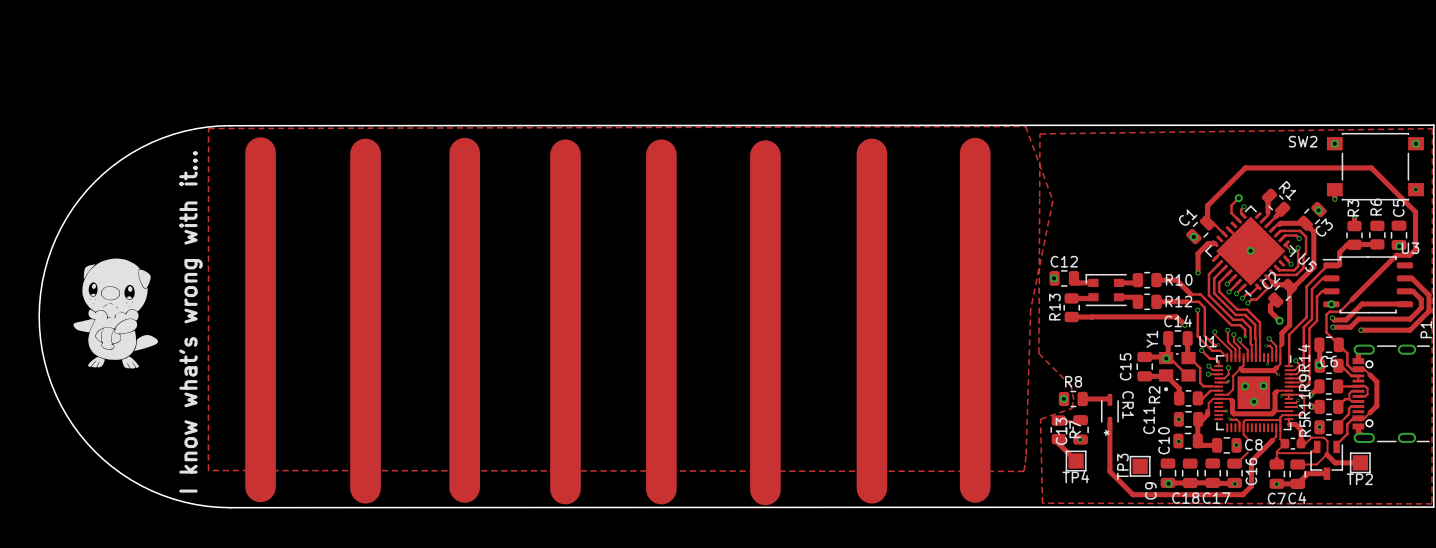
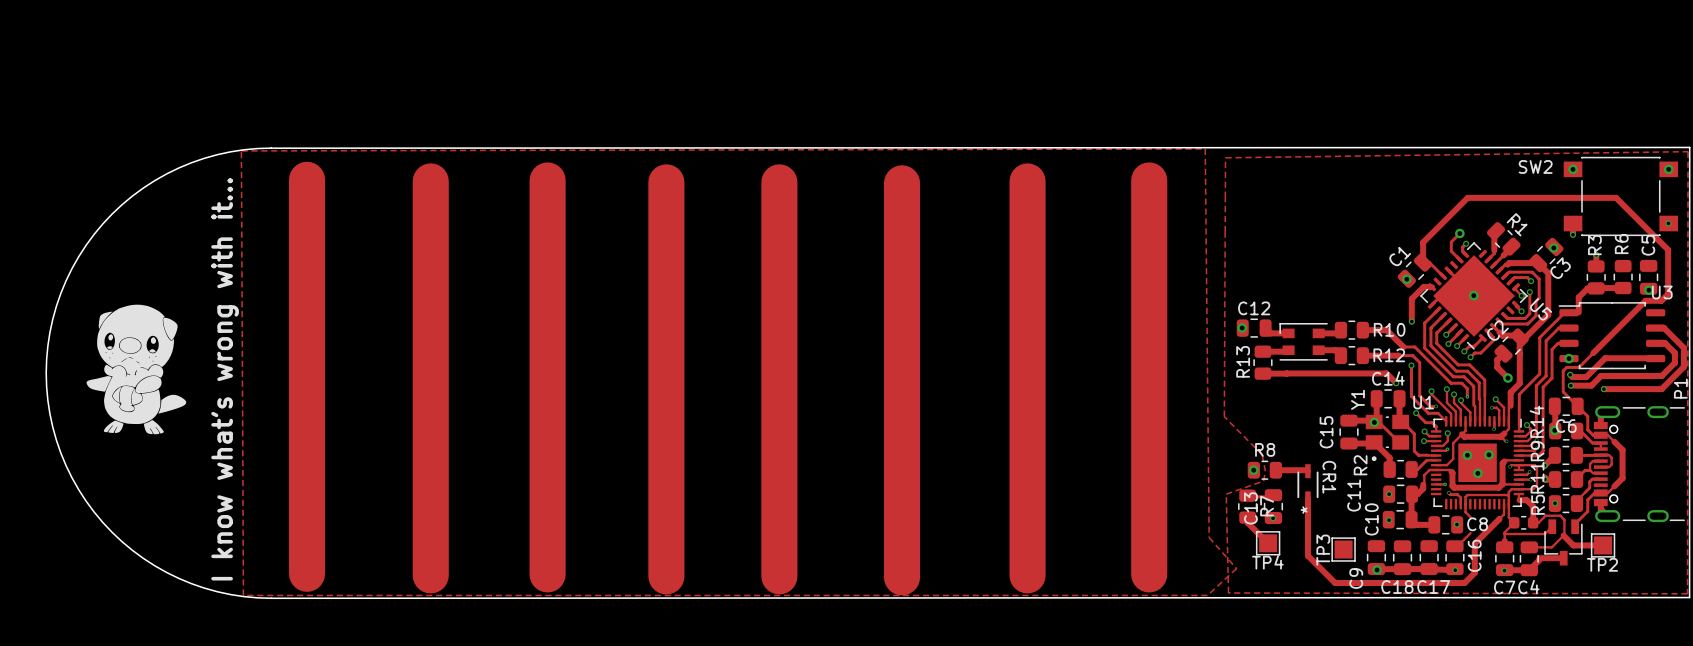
zone outline: (1025, 126) (208, 128) (208, 470) (1024, 471) (1030, 309) (1052, 200) (1025, 126) -> (1205, 148) (241, 150) (243, 595) (1207, 595) (1236, 568) (1209, 537) (1205, 148)

